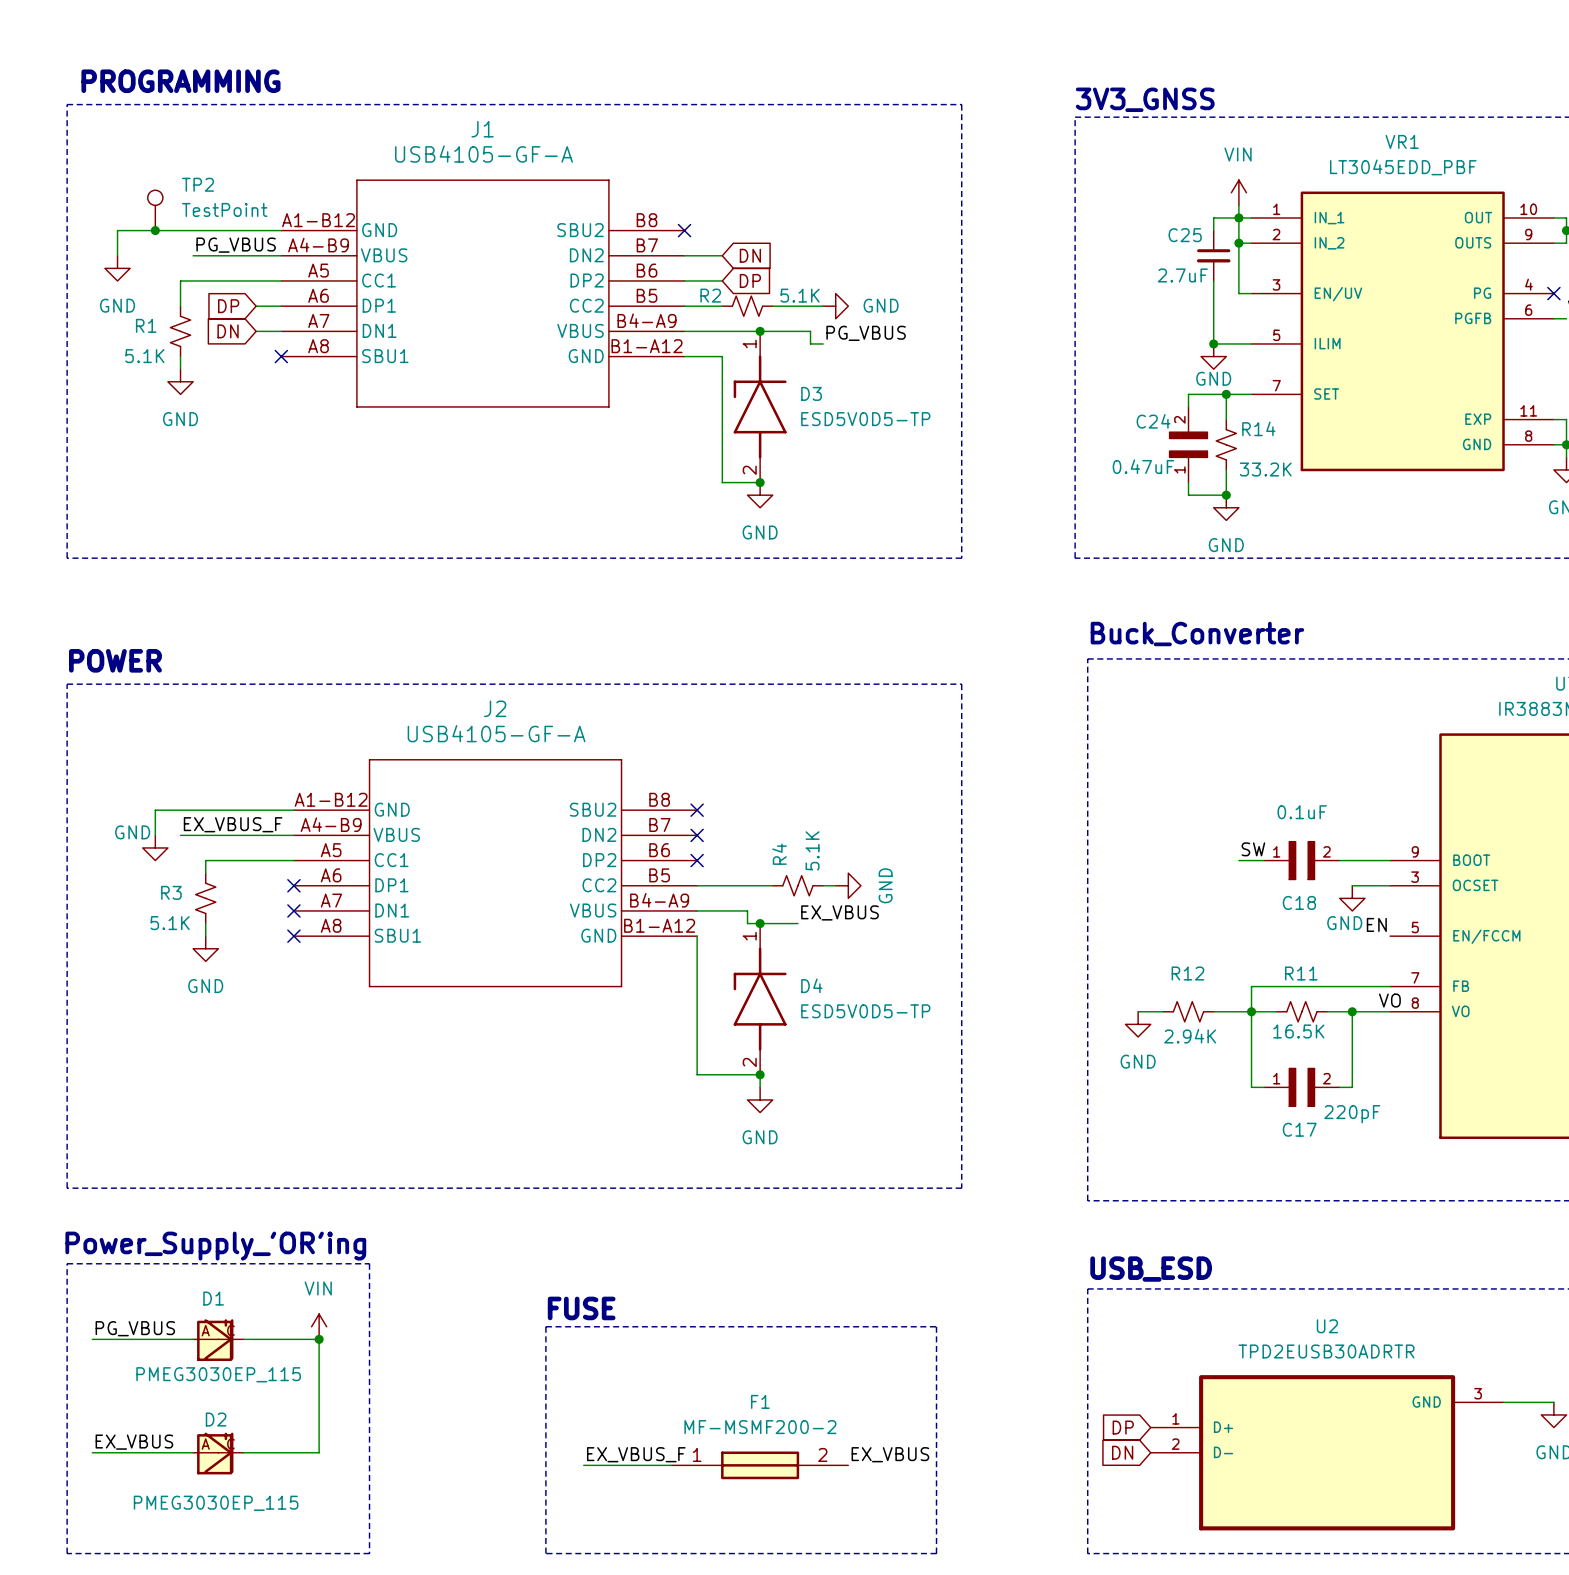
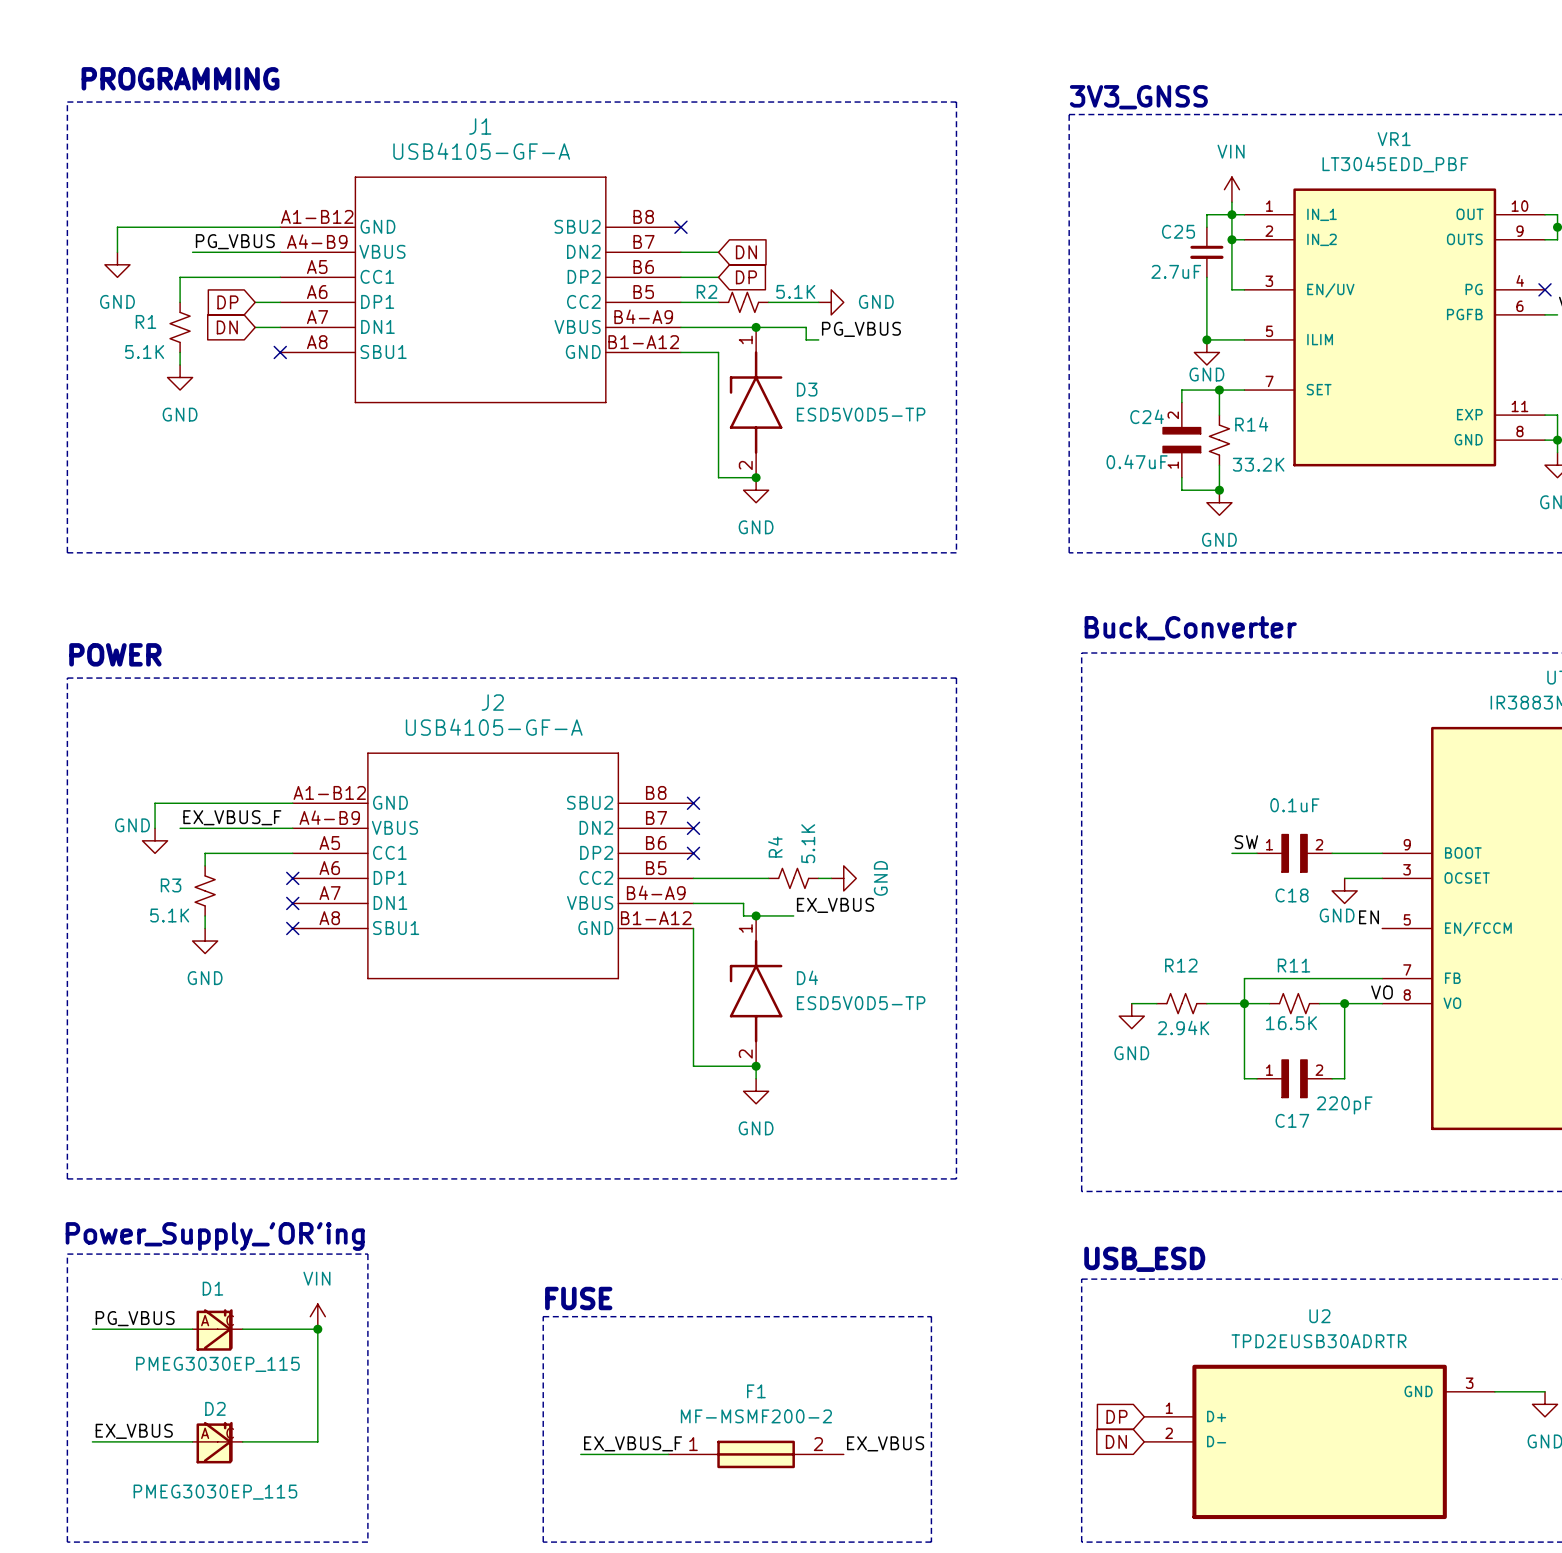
TP2: TestPoint (155, 210) -> none
junction: (155, 230) -> none

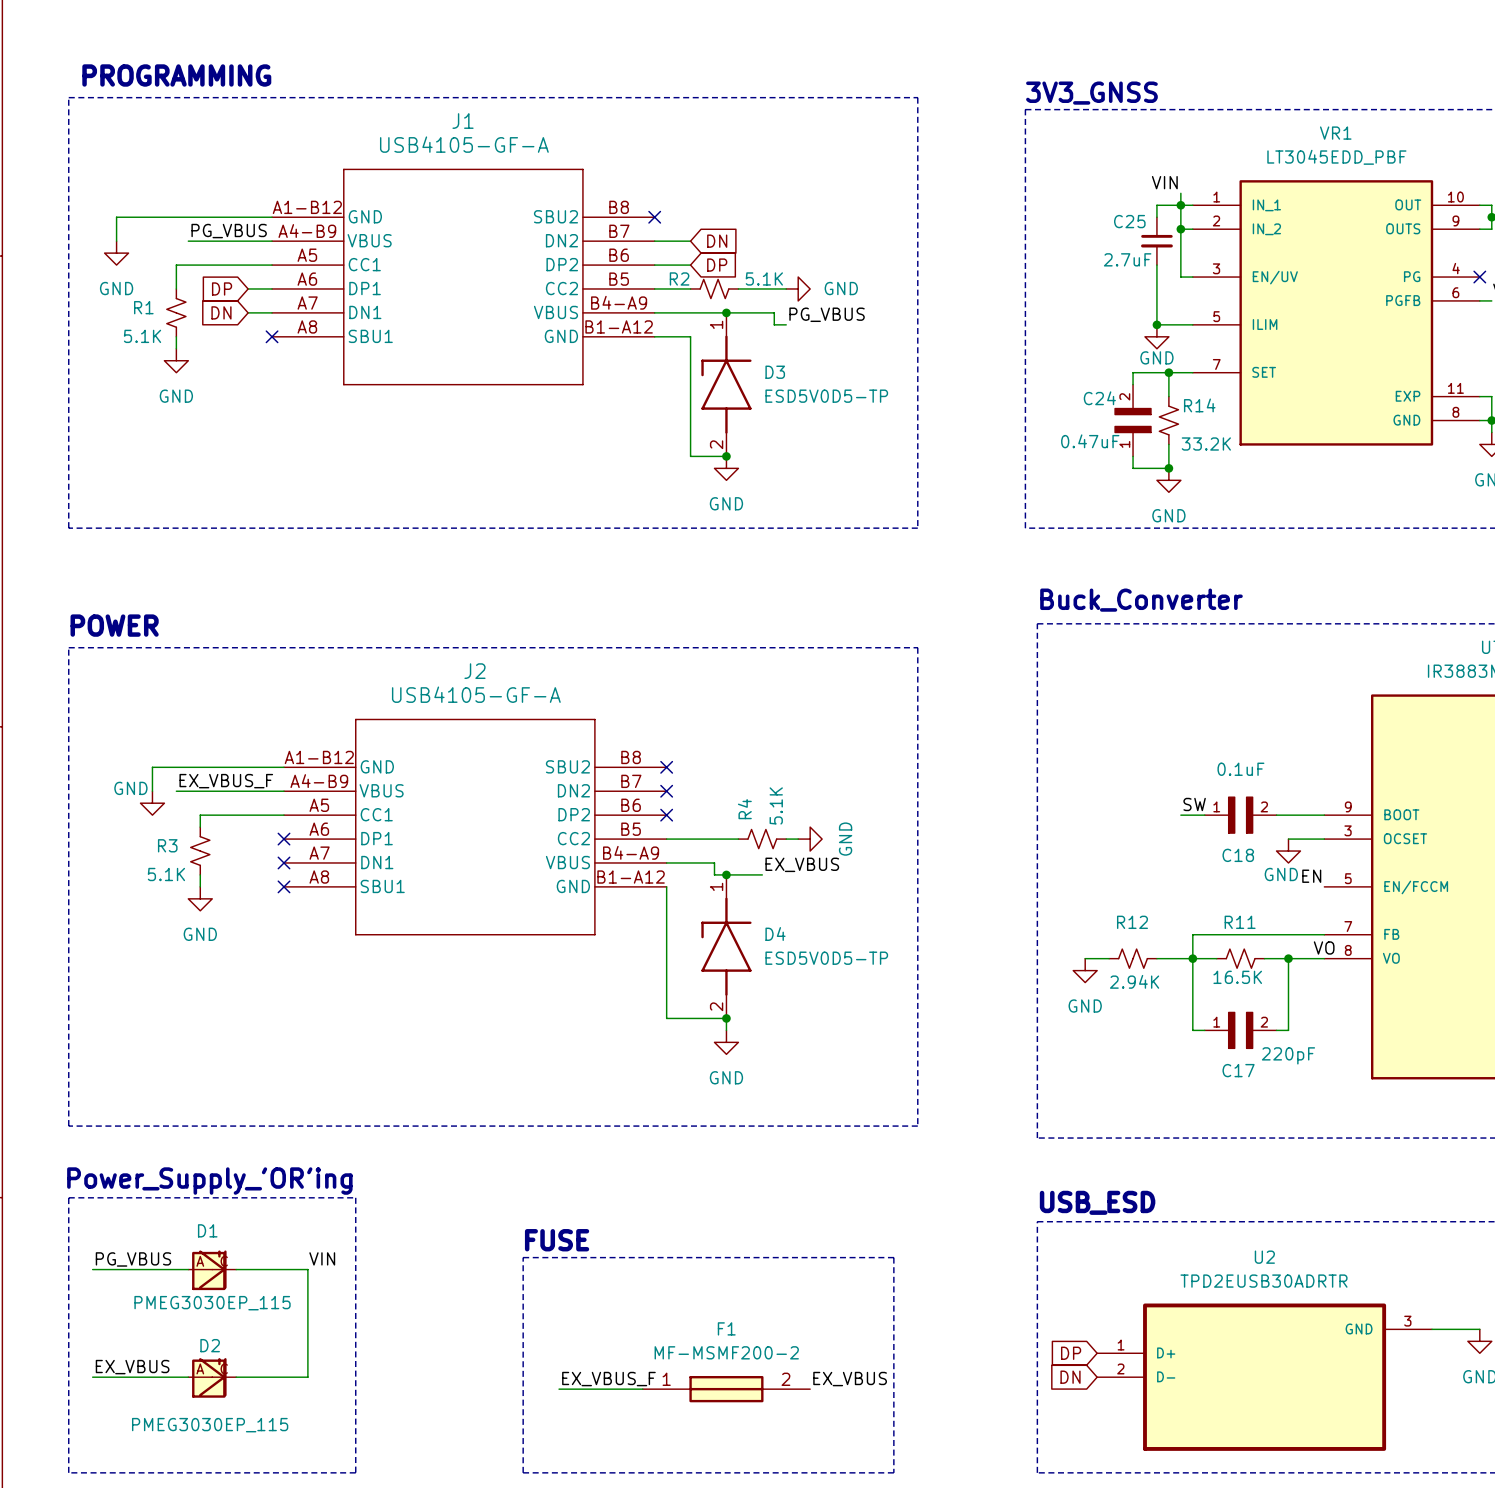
power symbol: VIN (1231, 189) -> none
label: none -> VIN (1164, 182)
power symbol: VIN (317, 1316) -> none
label: none -> VIN (322, 1258)
junction: (317, 1329) -> none

